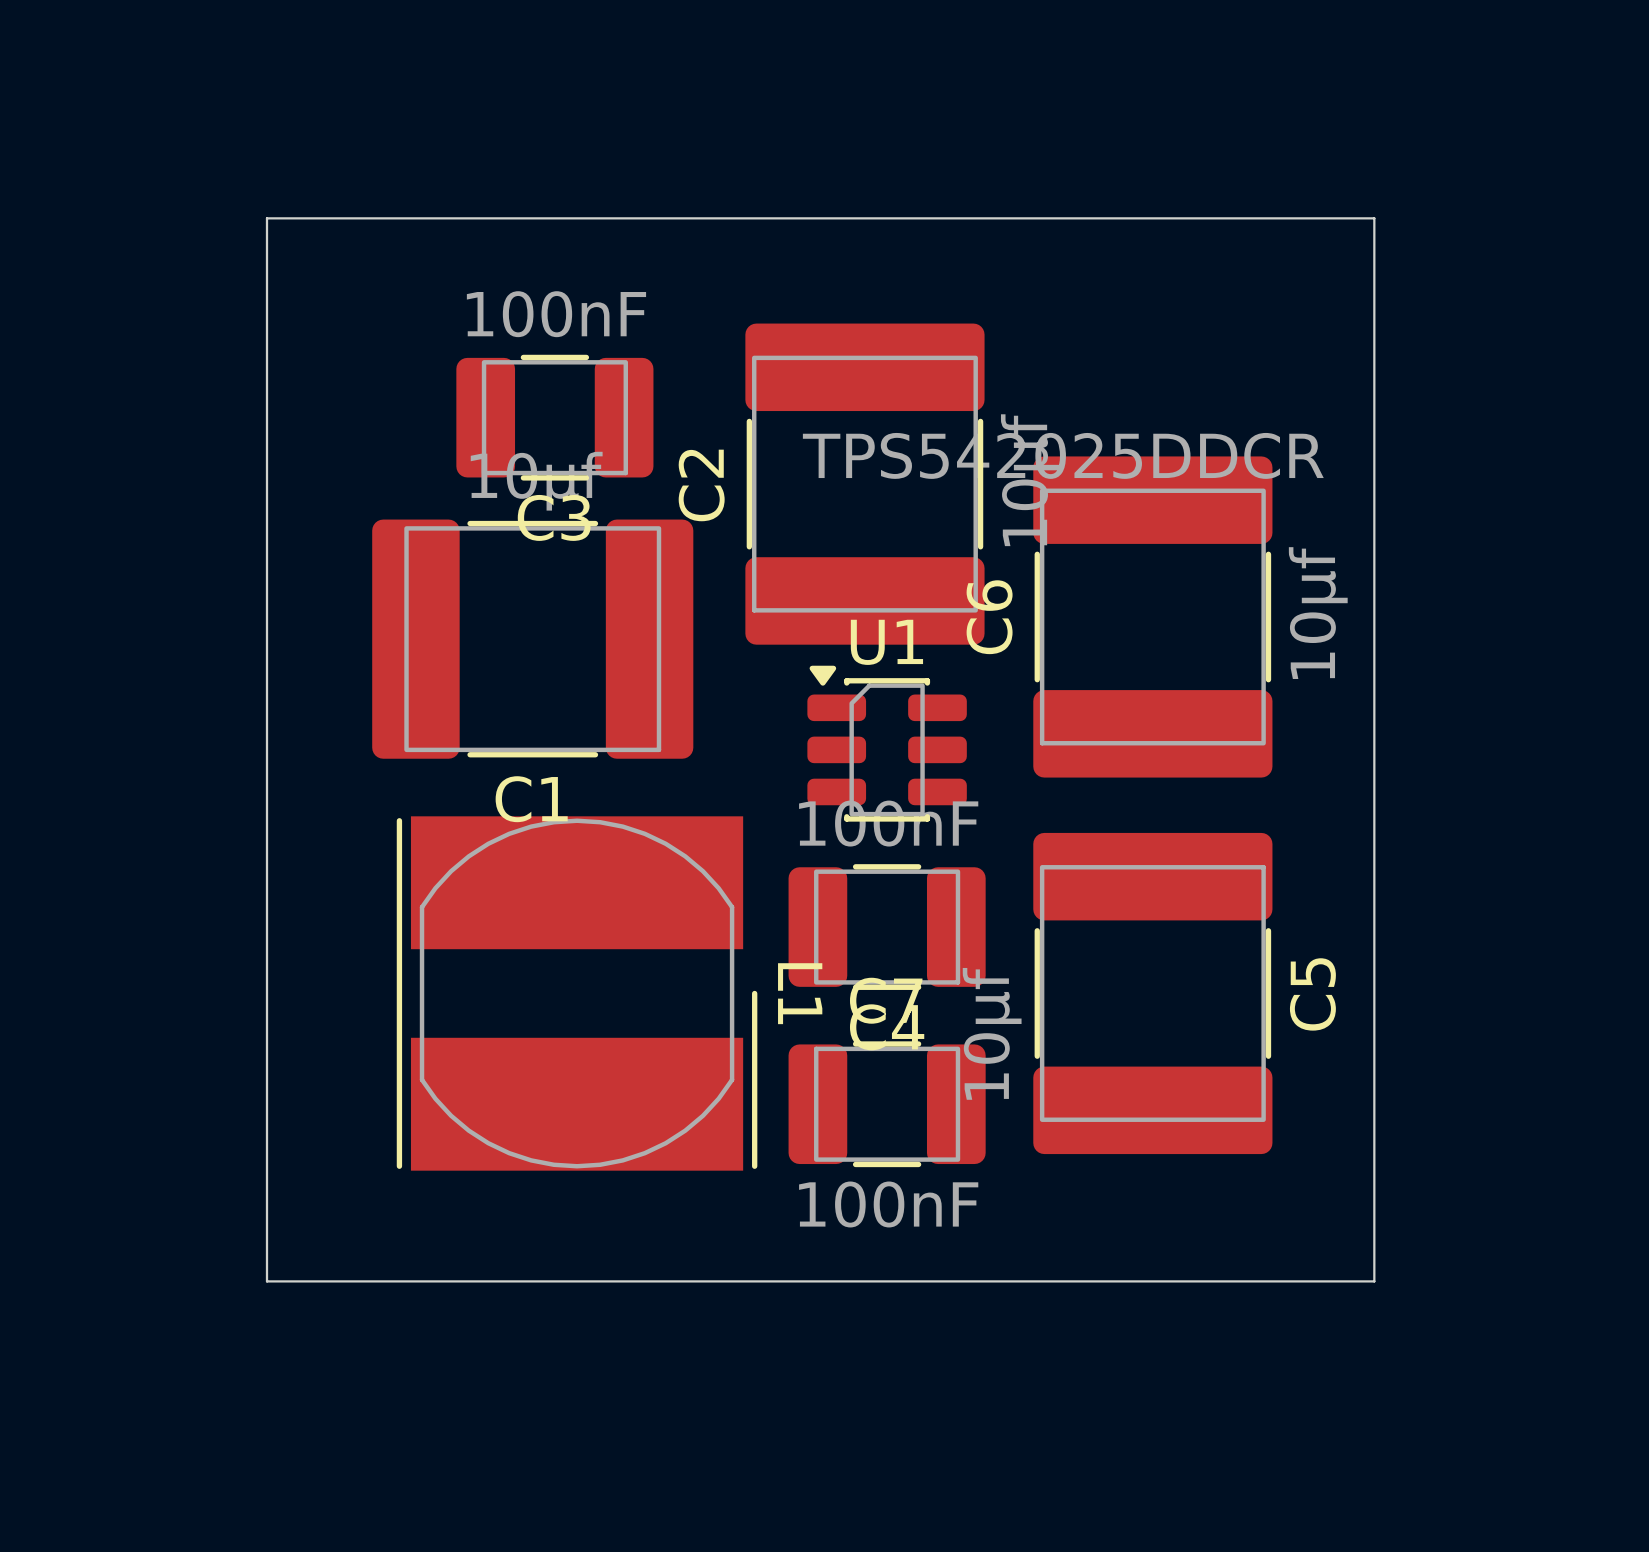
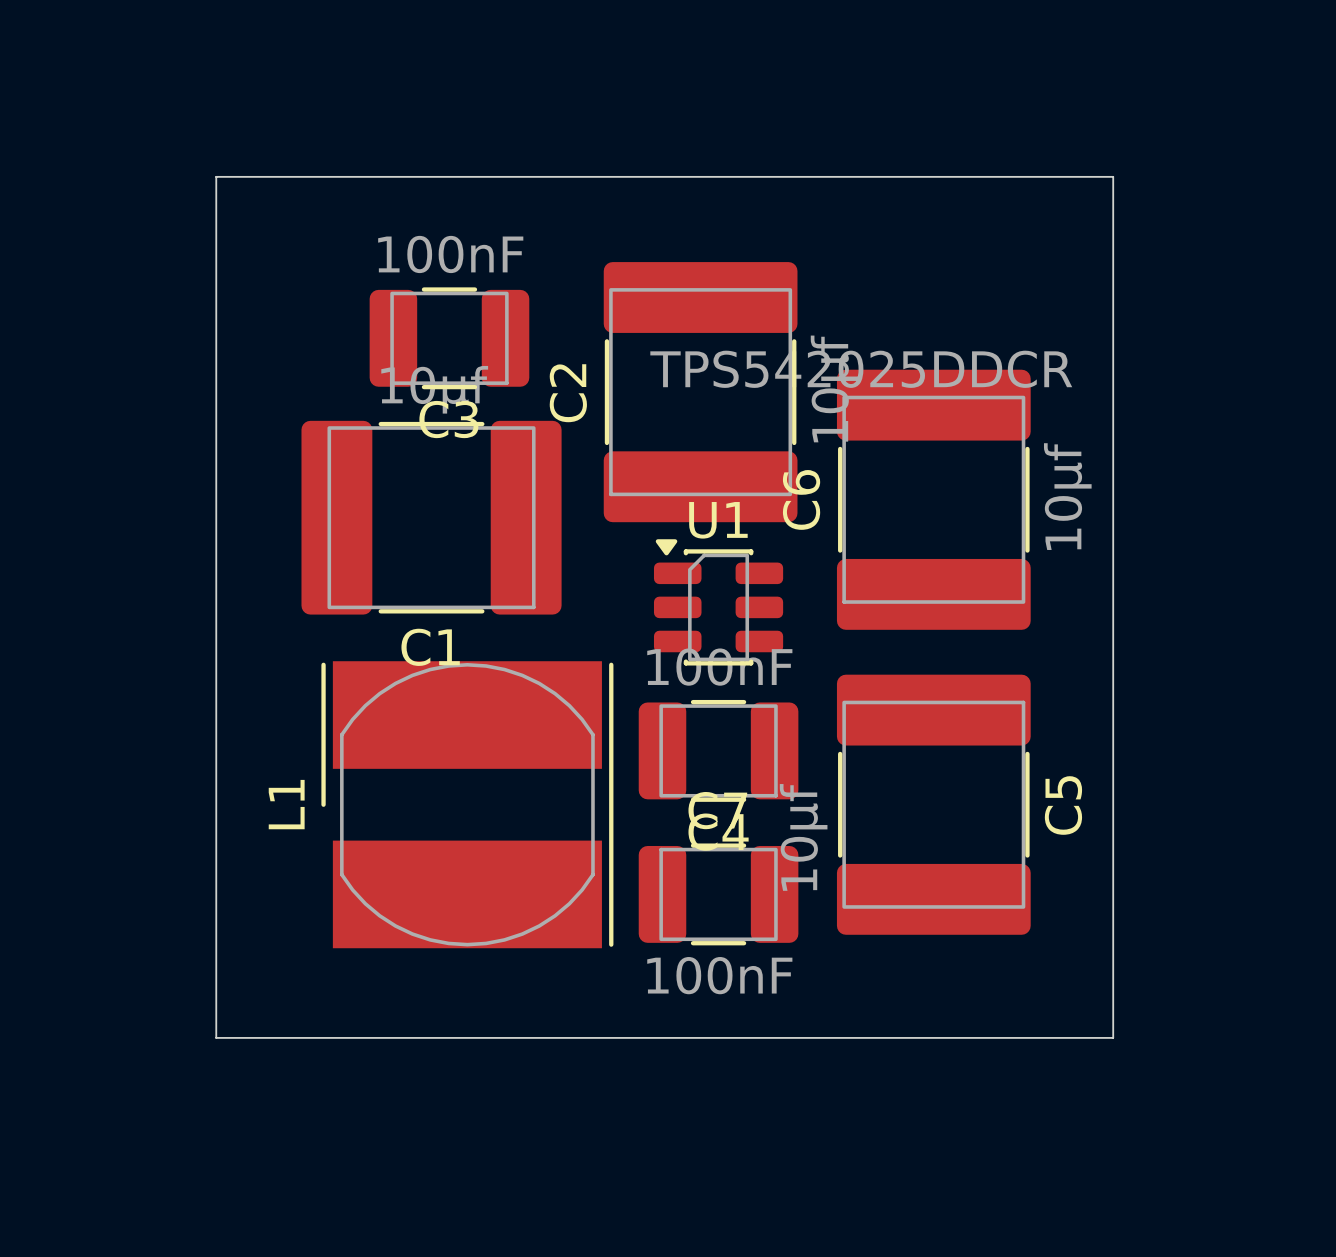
L1 rotation: 0° (577, 993) -> 180° (467, 804)

